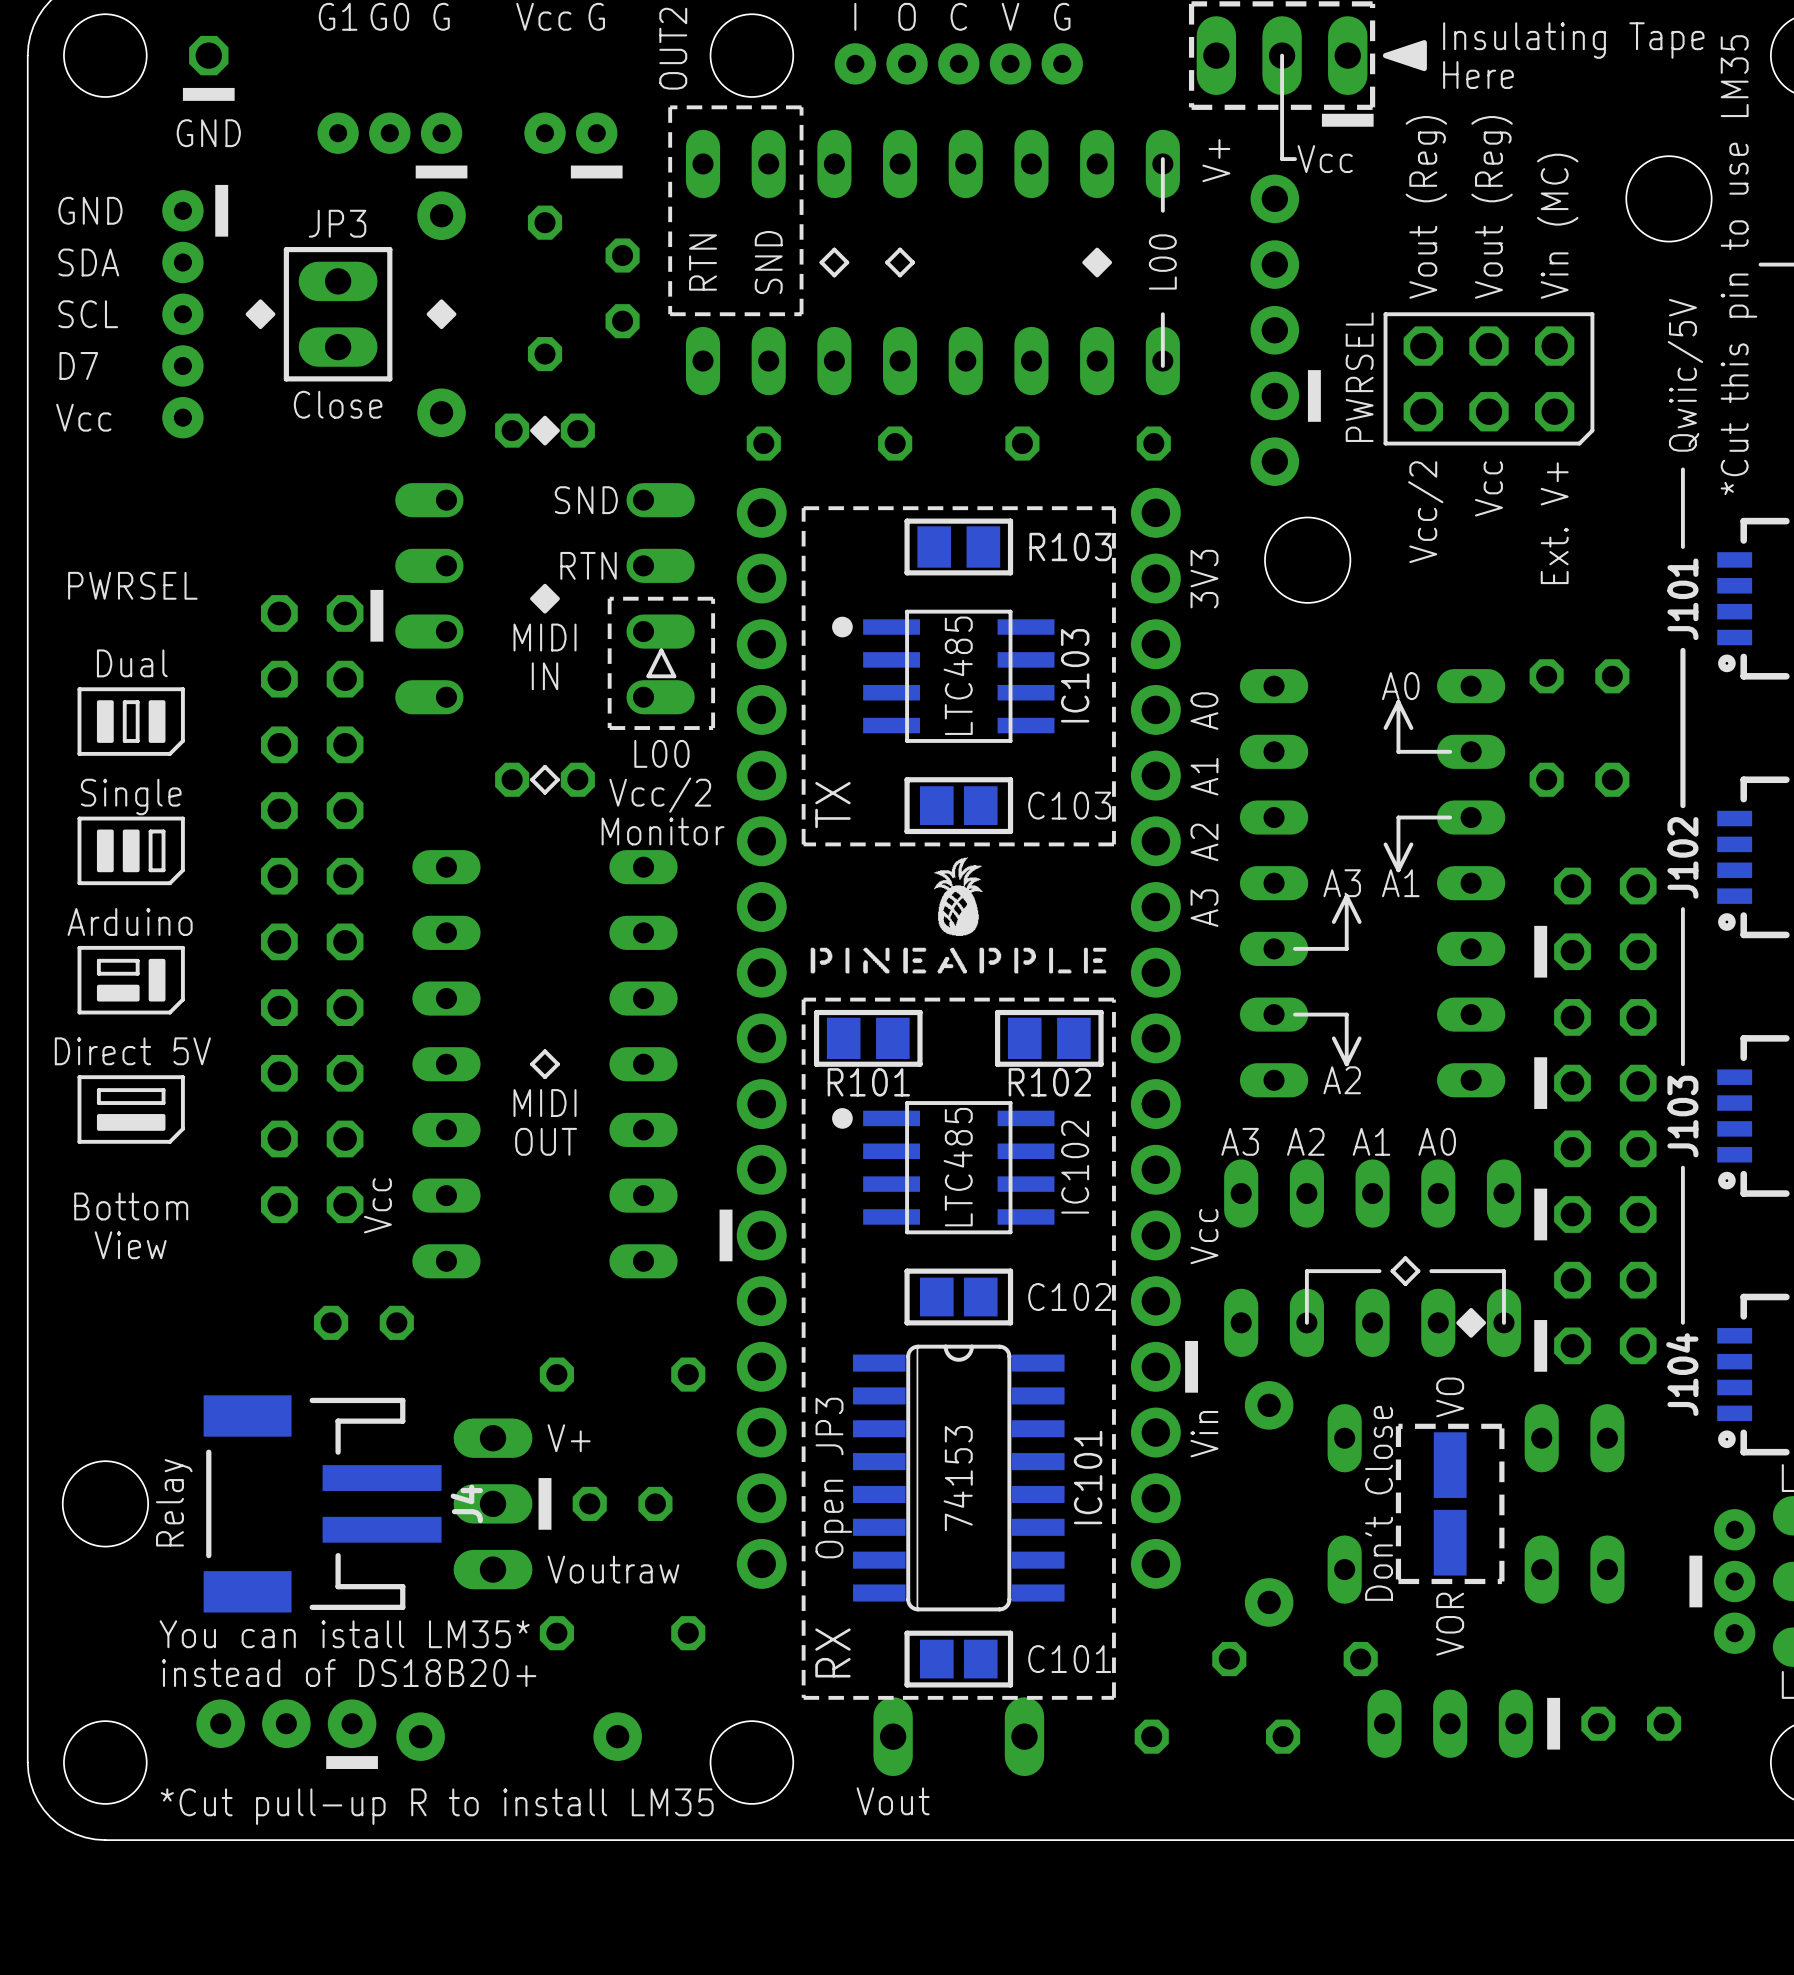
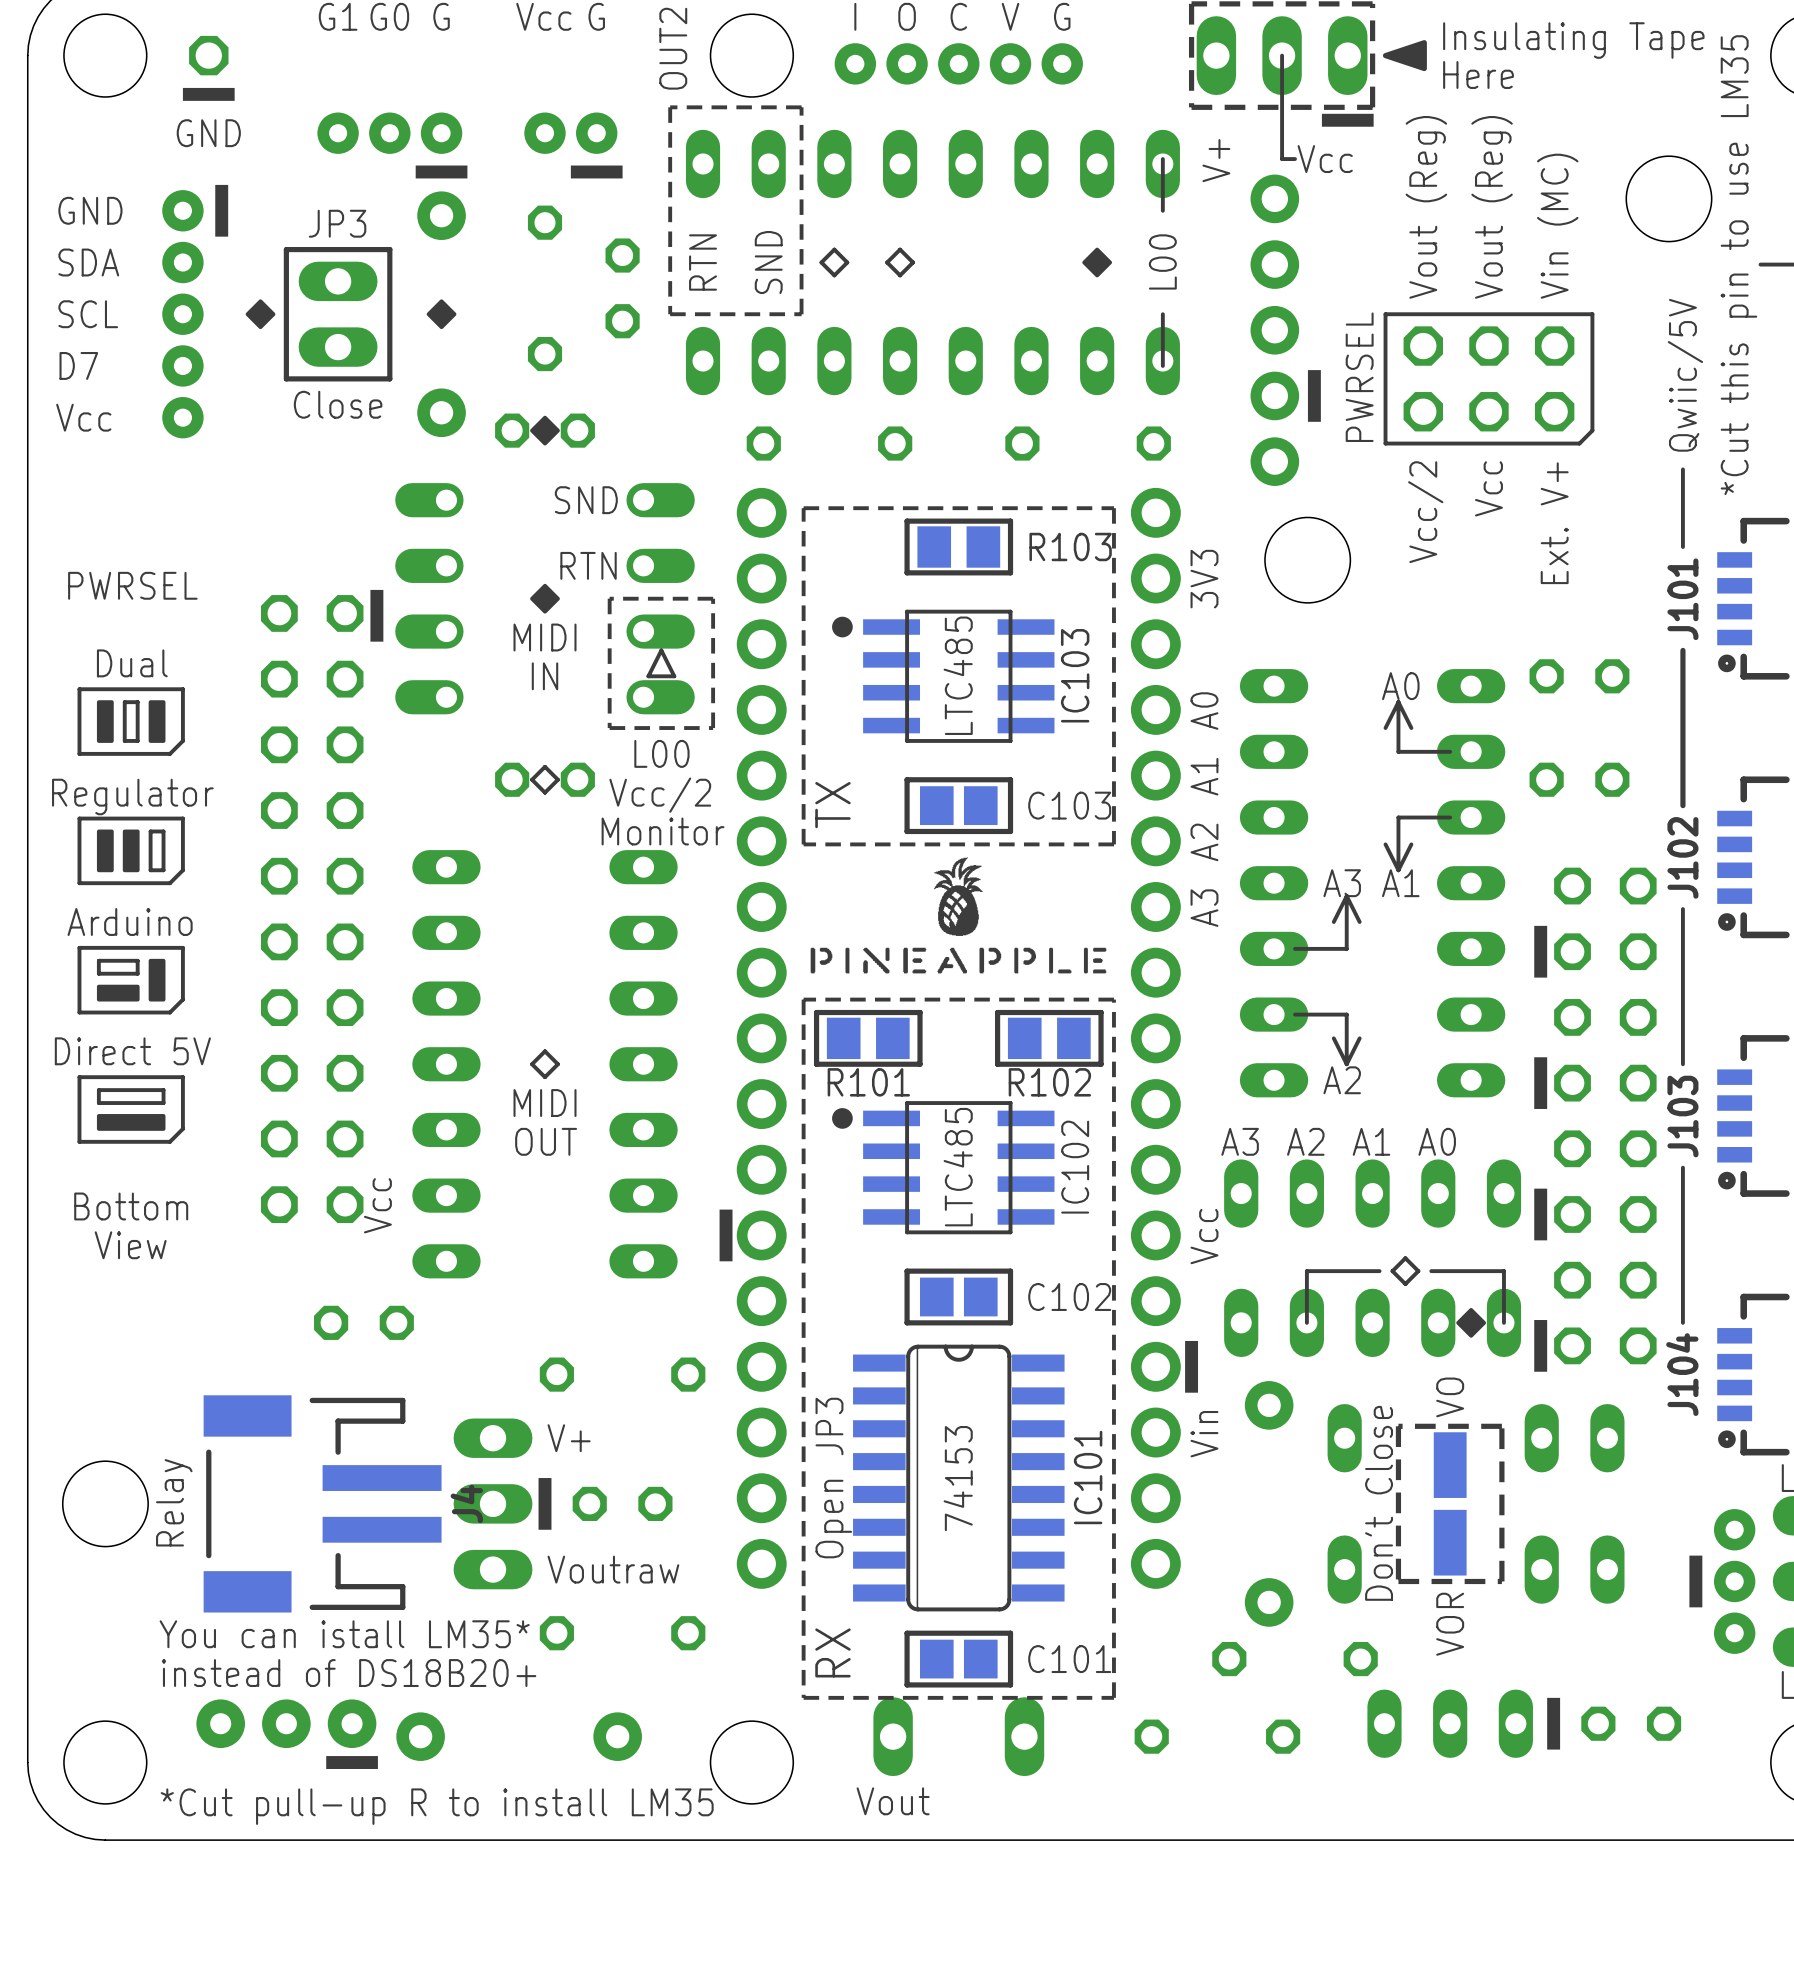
text: Single (131, 796) -> Regulator (132, 796)

